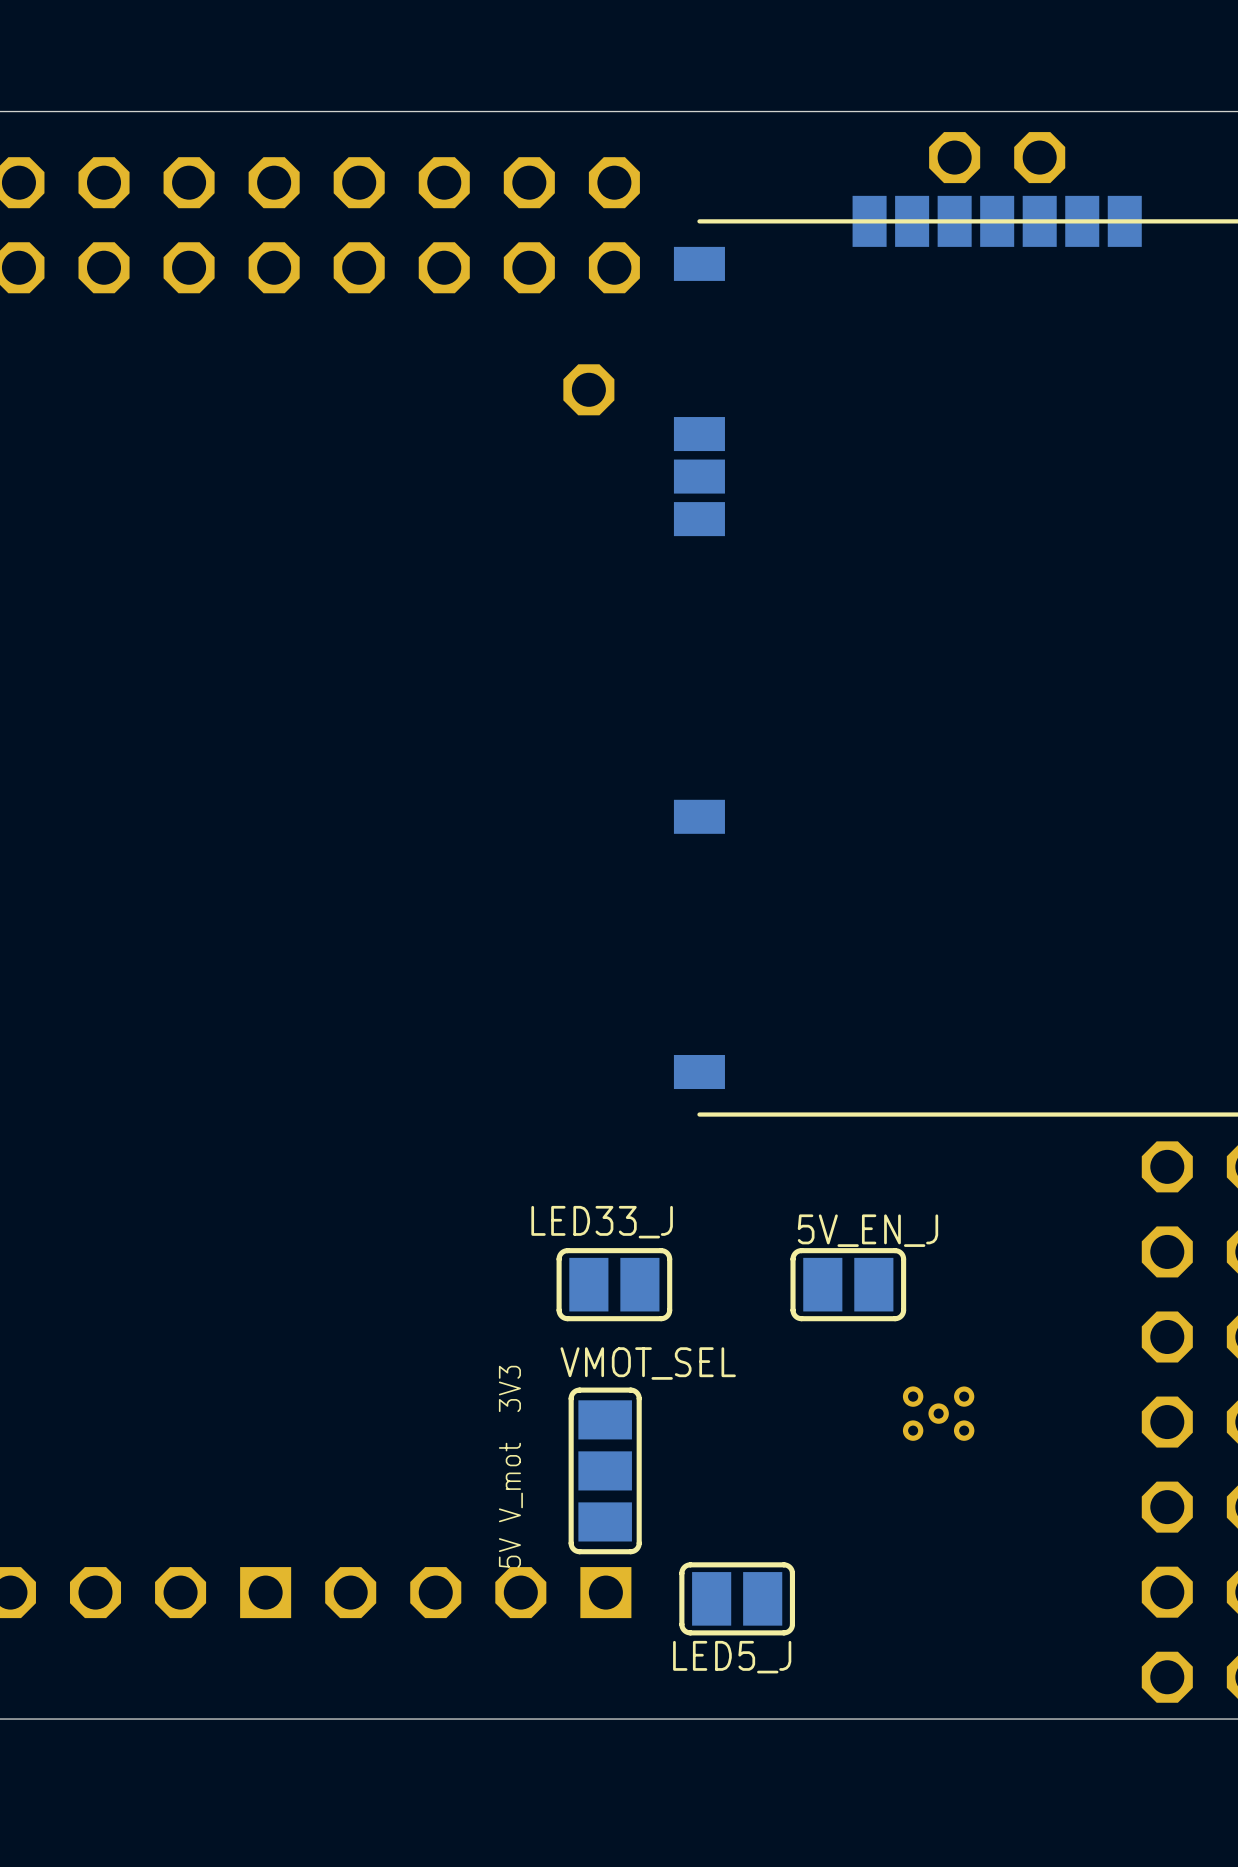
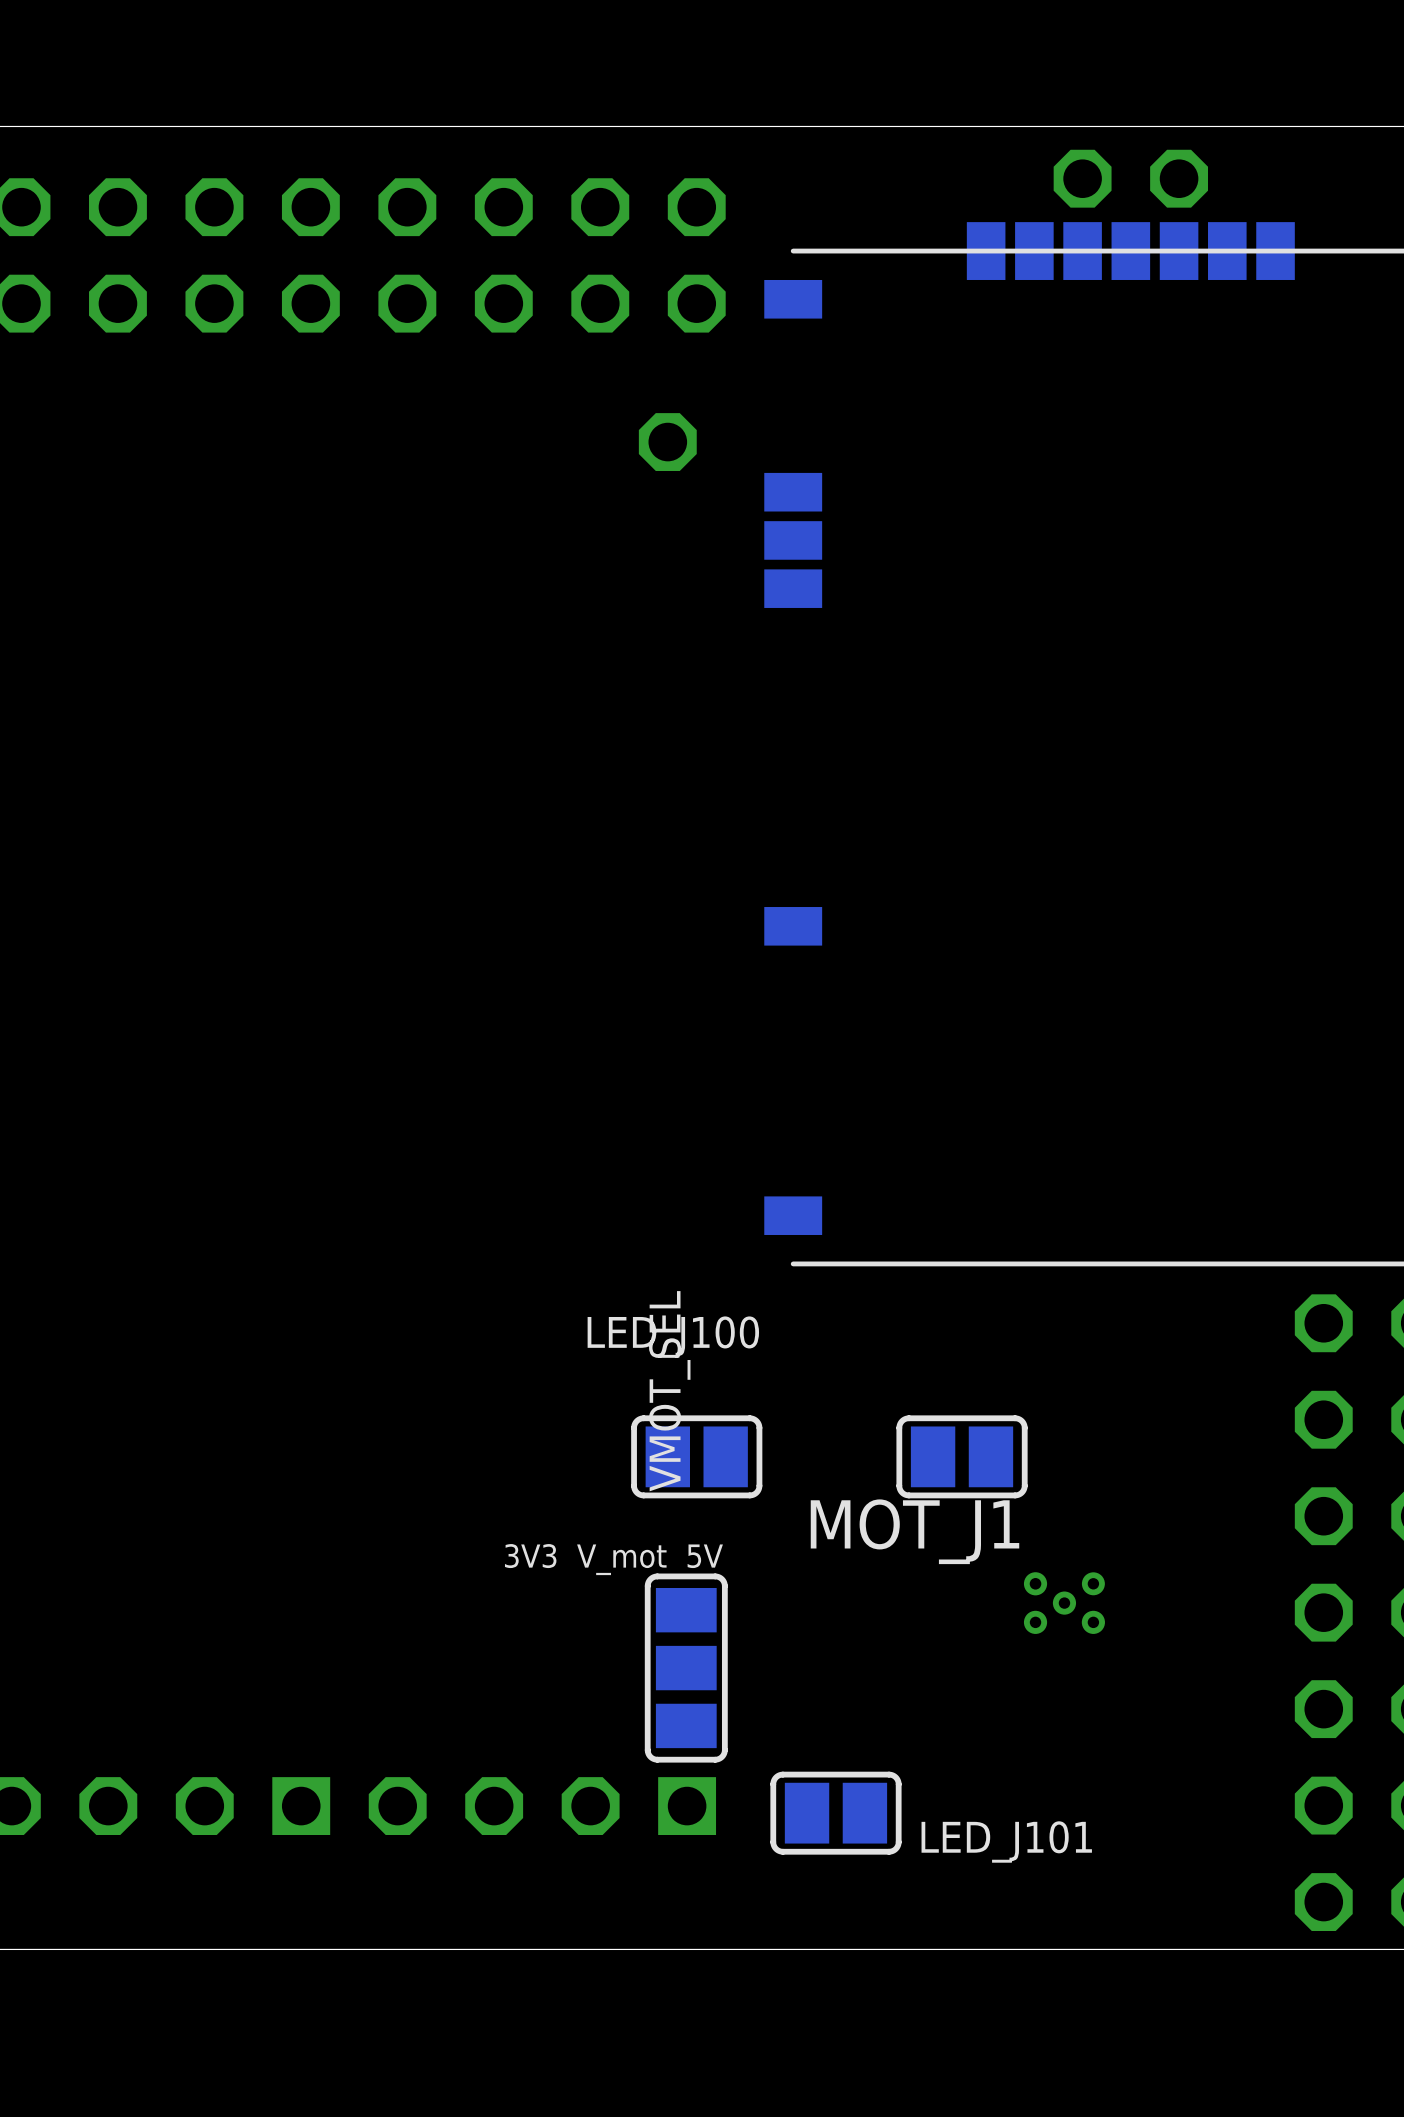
LED33_J name: LED33_J (602, 1222) -> LED_J100 (673, 1337)
5V_EN_J name: 5V_EN_J (867, 1230) -> MOT_J1 (914, 1531)
VMOT_SEL name rotation: 0° (648, 1363) -> 90° counterclockwise (669, 1391)
text: 5V V_mot 3V3 (510, 1466) -> 3V3 V_mot 5V (613, 1559)
LED5_J name: LED5_J (732, 1657) -> LED_J101 (1006, 1842)

